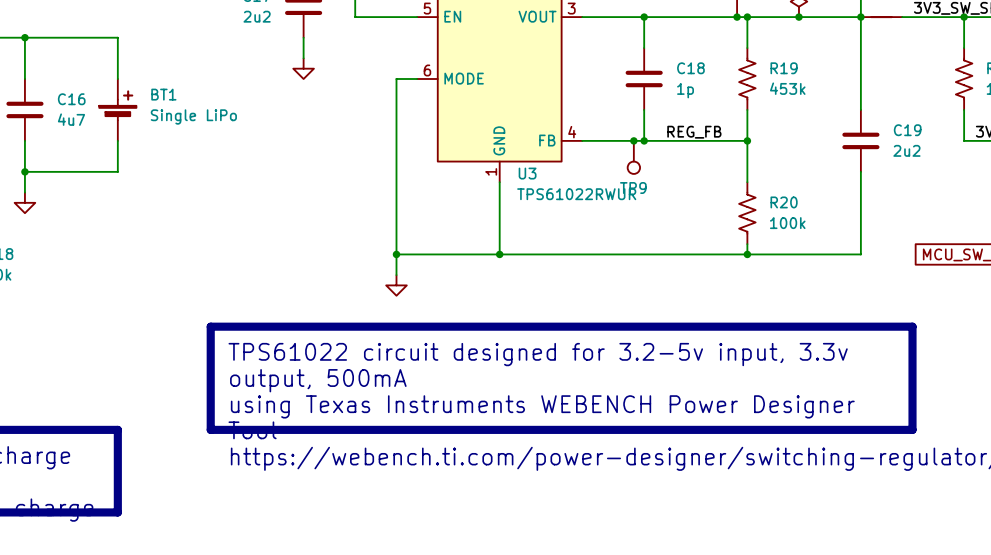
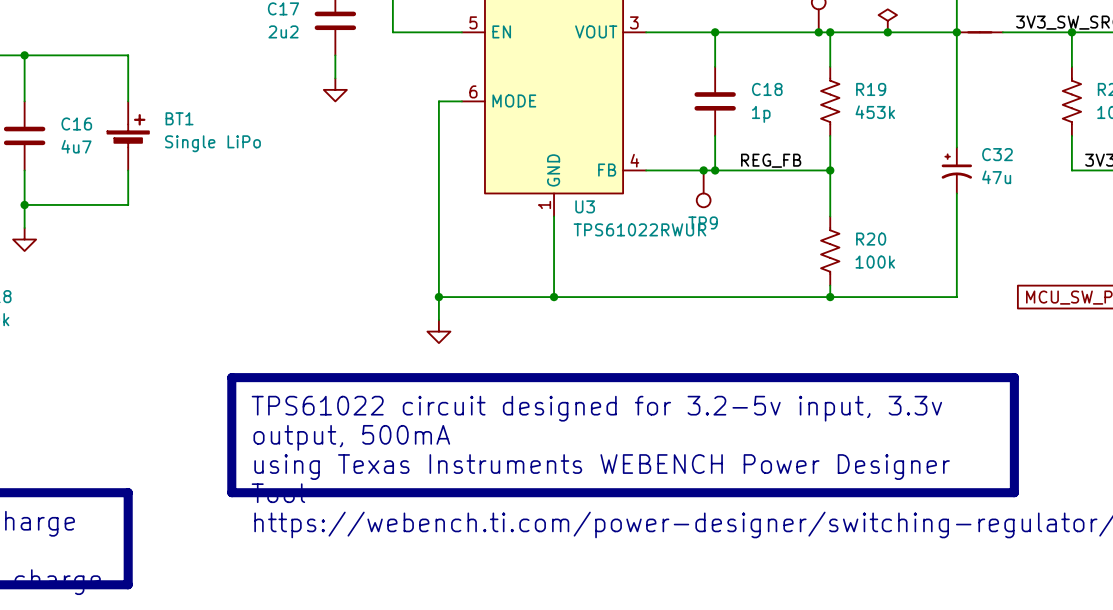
C19: 2u2 (860, 140) -> none
C32: none -> 47u (956, 170)

